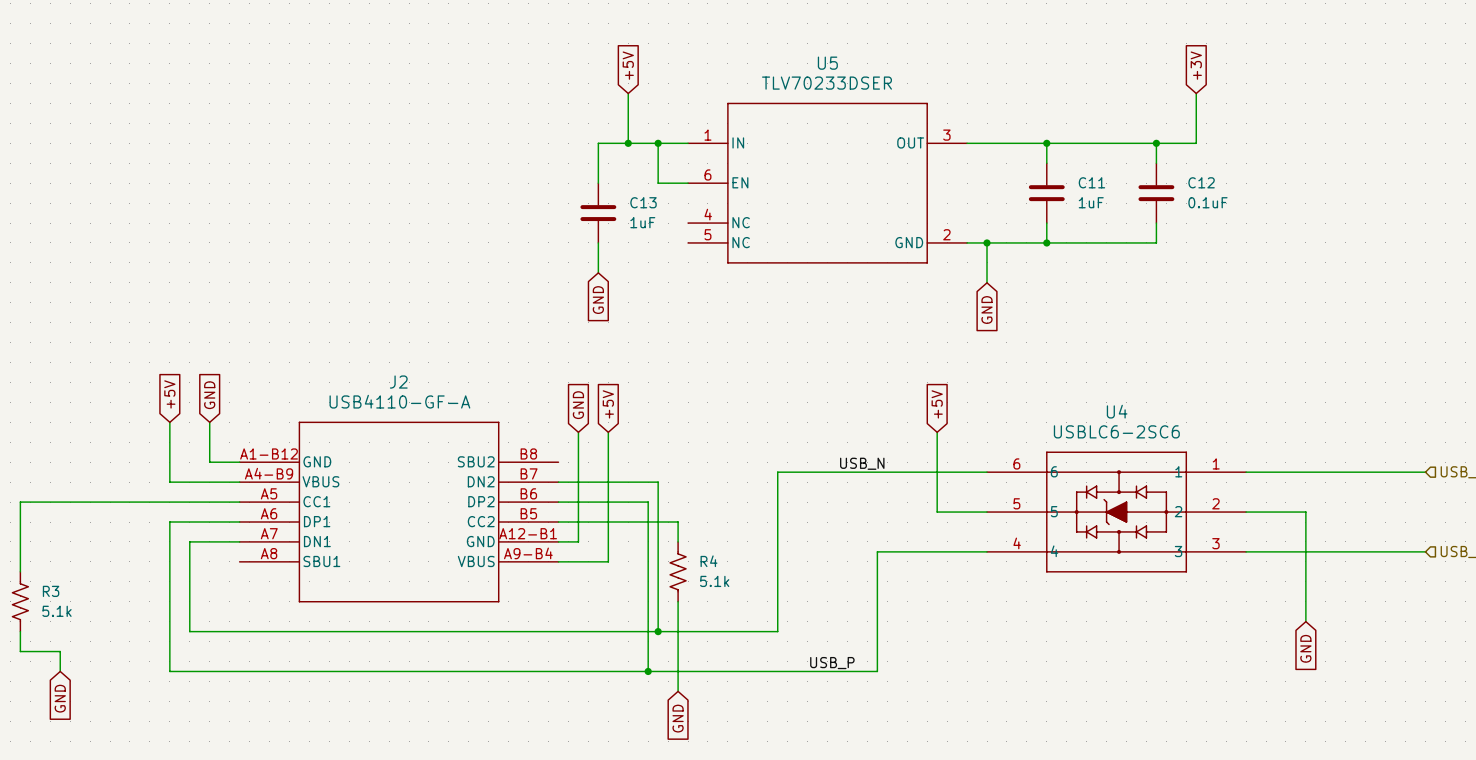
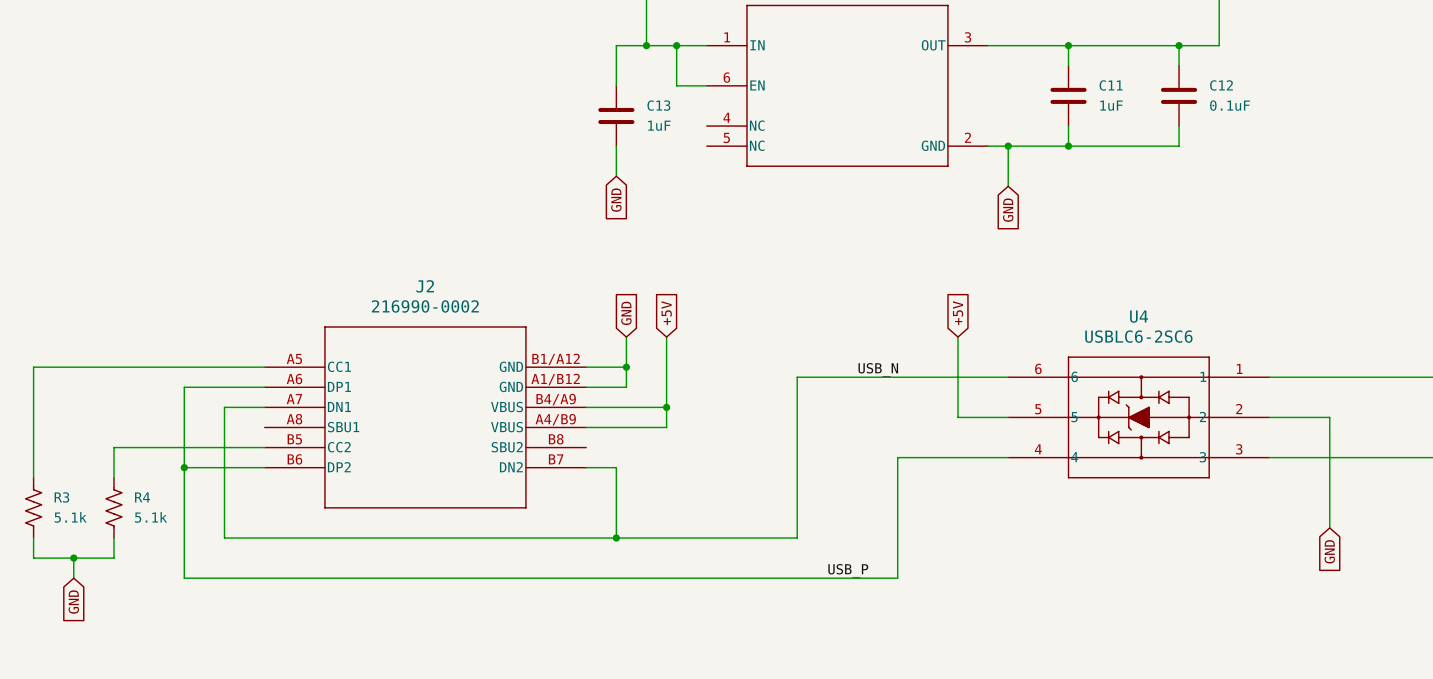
global label: +5V (169, 394) -> none
global label: GND (209, 395) -> none
J2 value: USB4110-GF-A (399, 401) -> 216990-0002 (425, 306)
global label: +5V (608, 404) -> GND (626, 313)
global label: none -> +5V (666, 313)
global label: GND (578, 405) -> none
J2 symbol: [239, 421, 559, 603] -> [264, 326, 587, 509]
wire: (169, 422) (169, 482) -> none
wire: (209, 422) (209, 462) -> none
wire: (578, 432) (578, 541) (558, 541) -> none
wire: none -> (666, 337) (666, 407)
wire: none -> (586, 367) (626, 367)
junction: none -> (626, 367)
wire: (20, 502) (209, 502) -> (33, 407) (33, 367) (224, 367)
junction: none -> (666, 407)
wire: (169, 522) (239, 522) -> (184, 427) (184, 387)
wire: (189, 541) (189, 631) (209, 631) -> (224, 407) (224, 538)
wire: none -> (204, 447) (113, 447) (113, 477)
wire: (678, 541) (678, 522) (648, 522) (648, 671) -> none
wire: none -> (184, 467) (264, 467)
junction: none -> (184, 467)
wire: (598, 561) (608, 561) (608, 482) (658, 482) (658, 631) -> (616, 467) (616, 538)
R4 position: (678, 571) -> (113, 507)
wire: (678, 601) (678, 691) -> none
wire: none -> (113, 538) (113, 558) (73, 558)
junction: none -> (616, 538)
junction: (658, 631) -> none
junction: none -> (73, 558)
junction: (648, 671) -> none
global label: GND (678, 718) -> none

